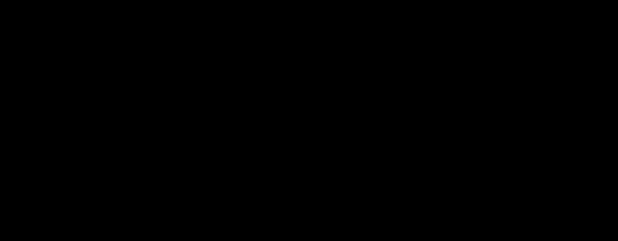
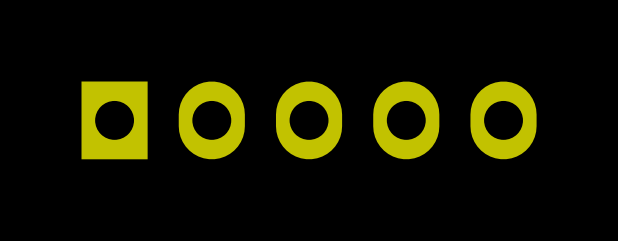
part: none -> (309, 120)

